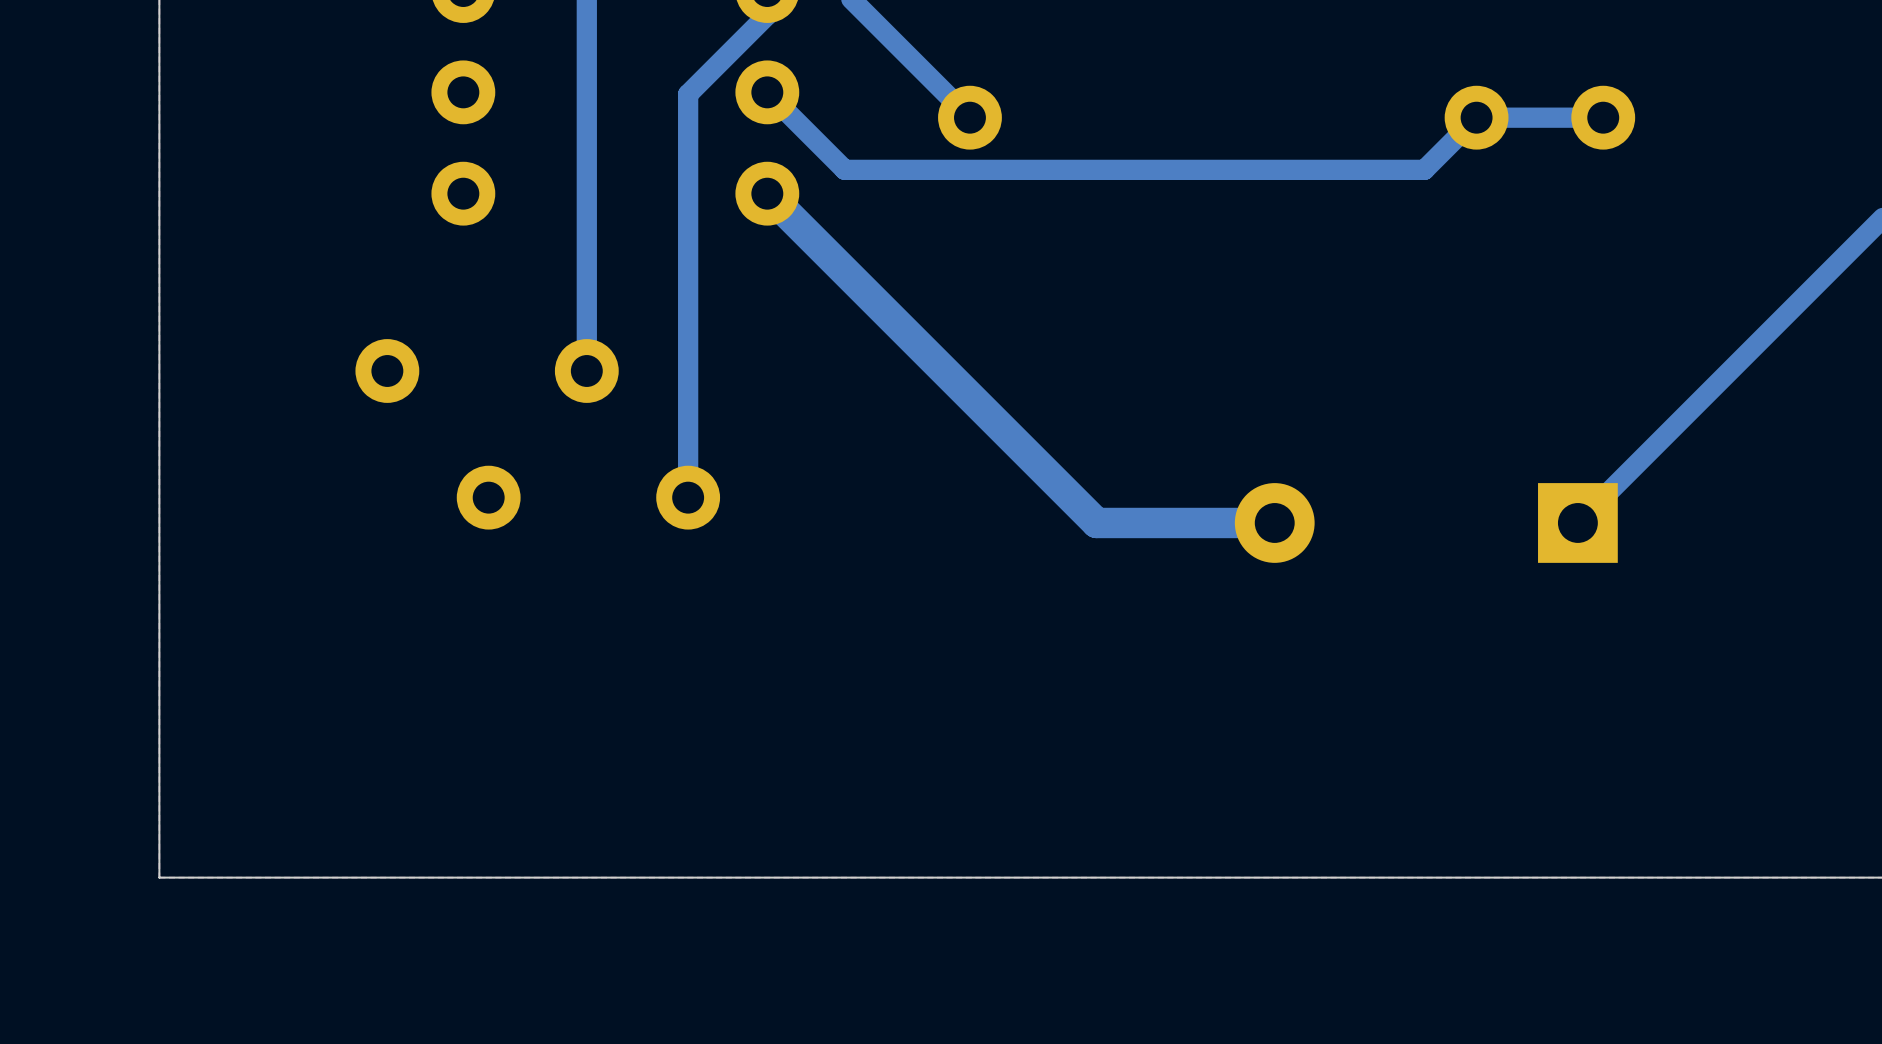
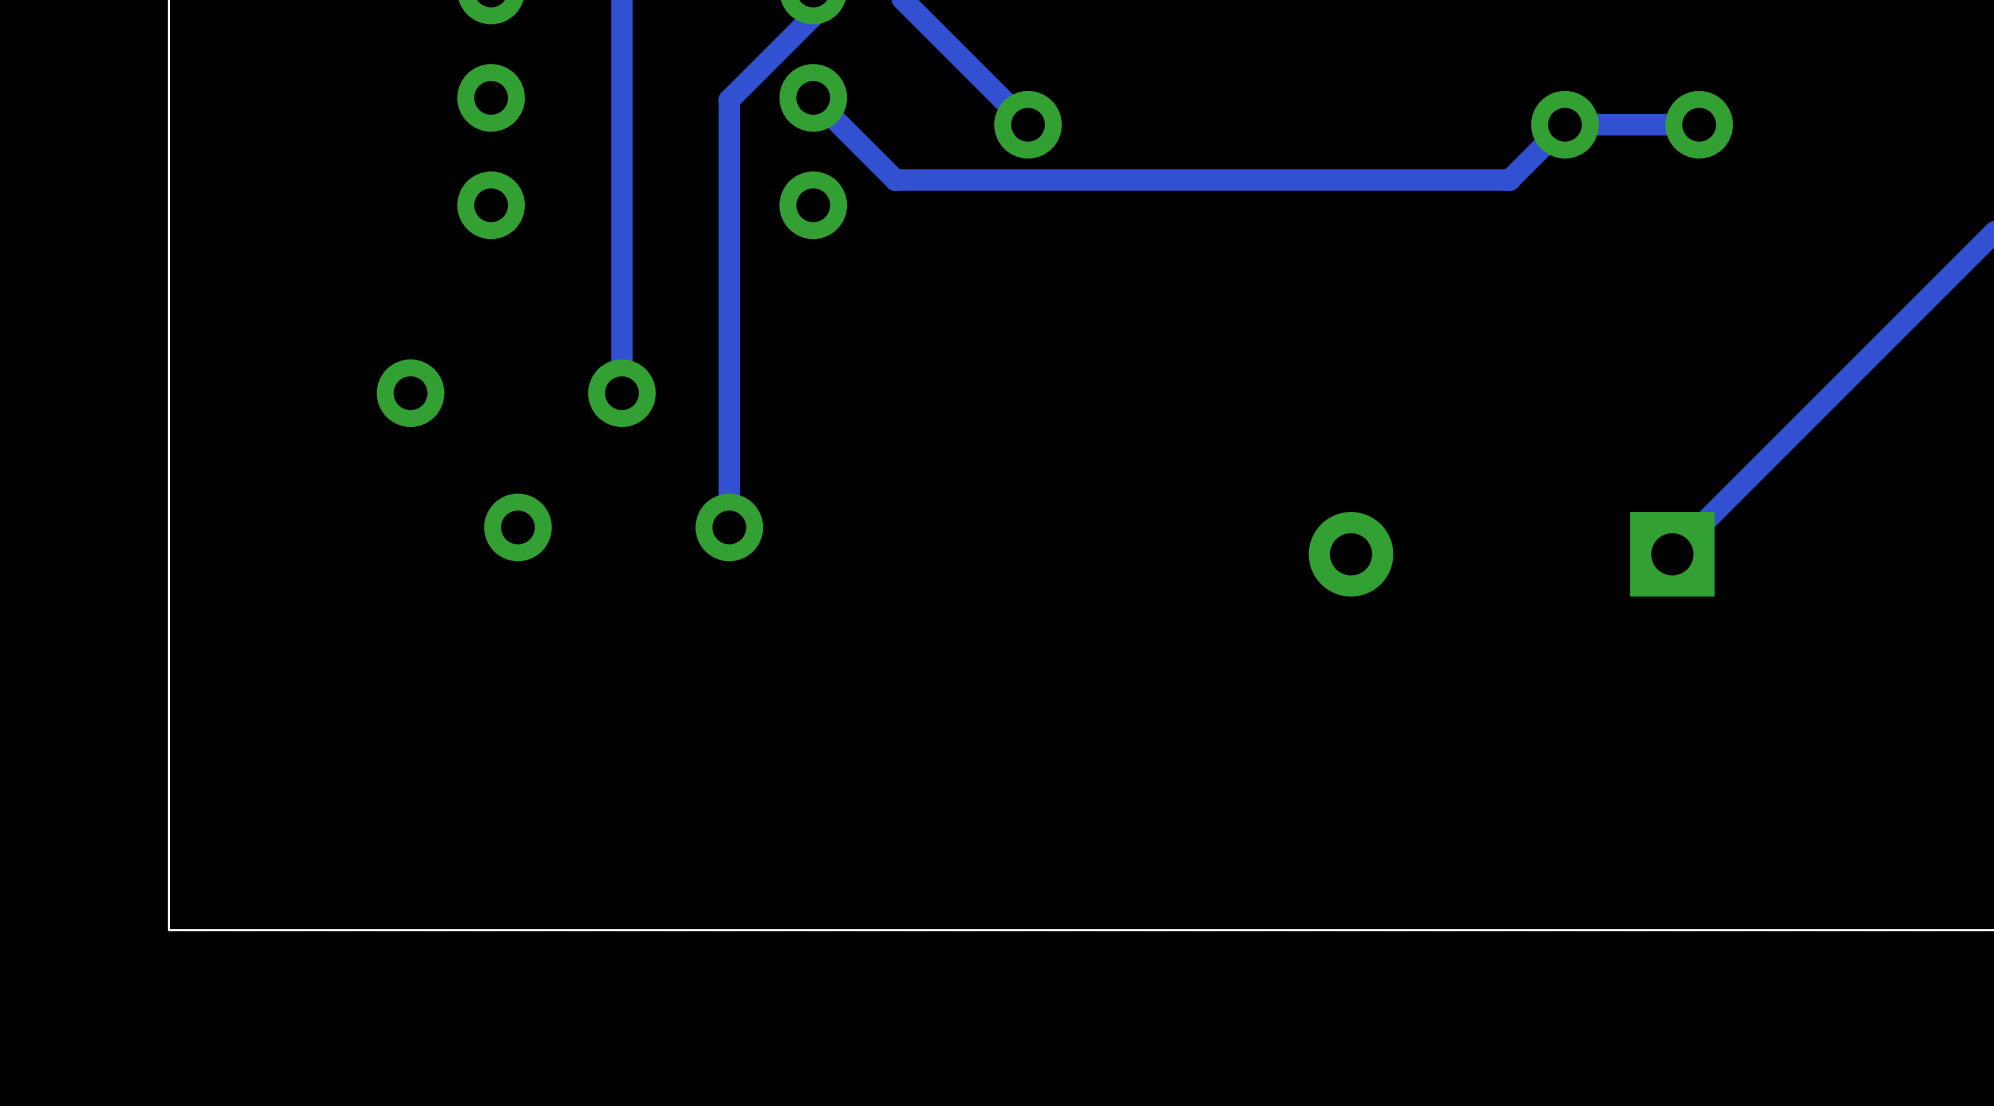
bottom track: (767, 193) (1096, 522) (1274, 522) -> none

